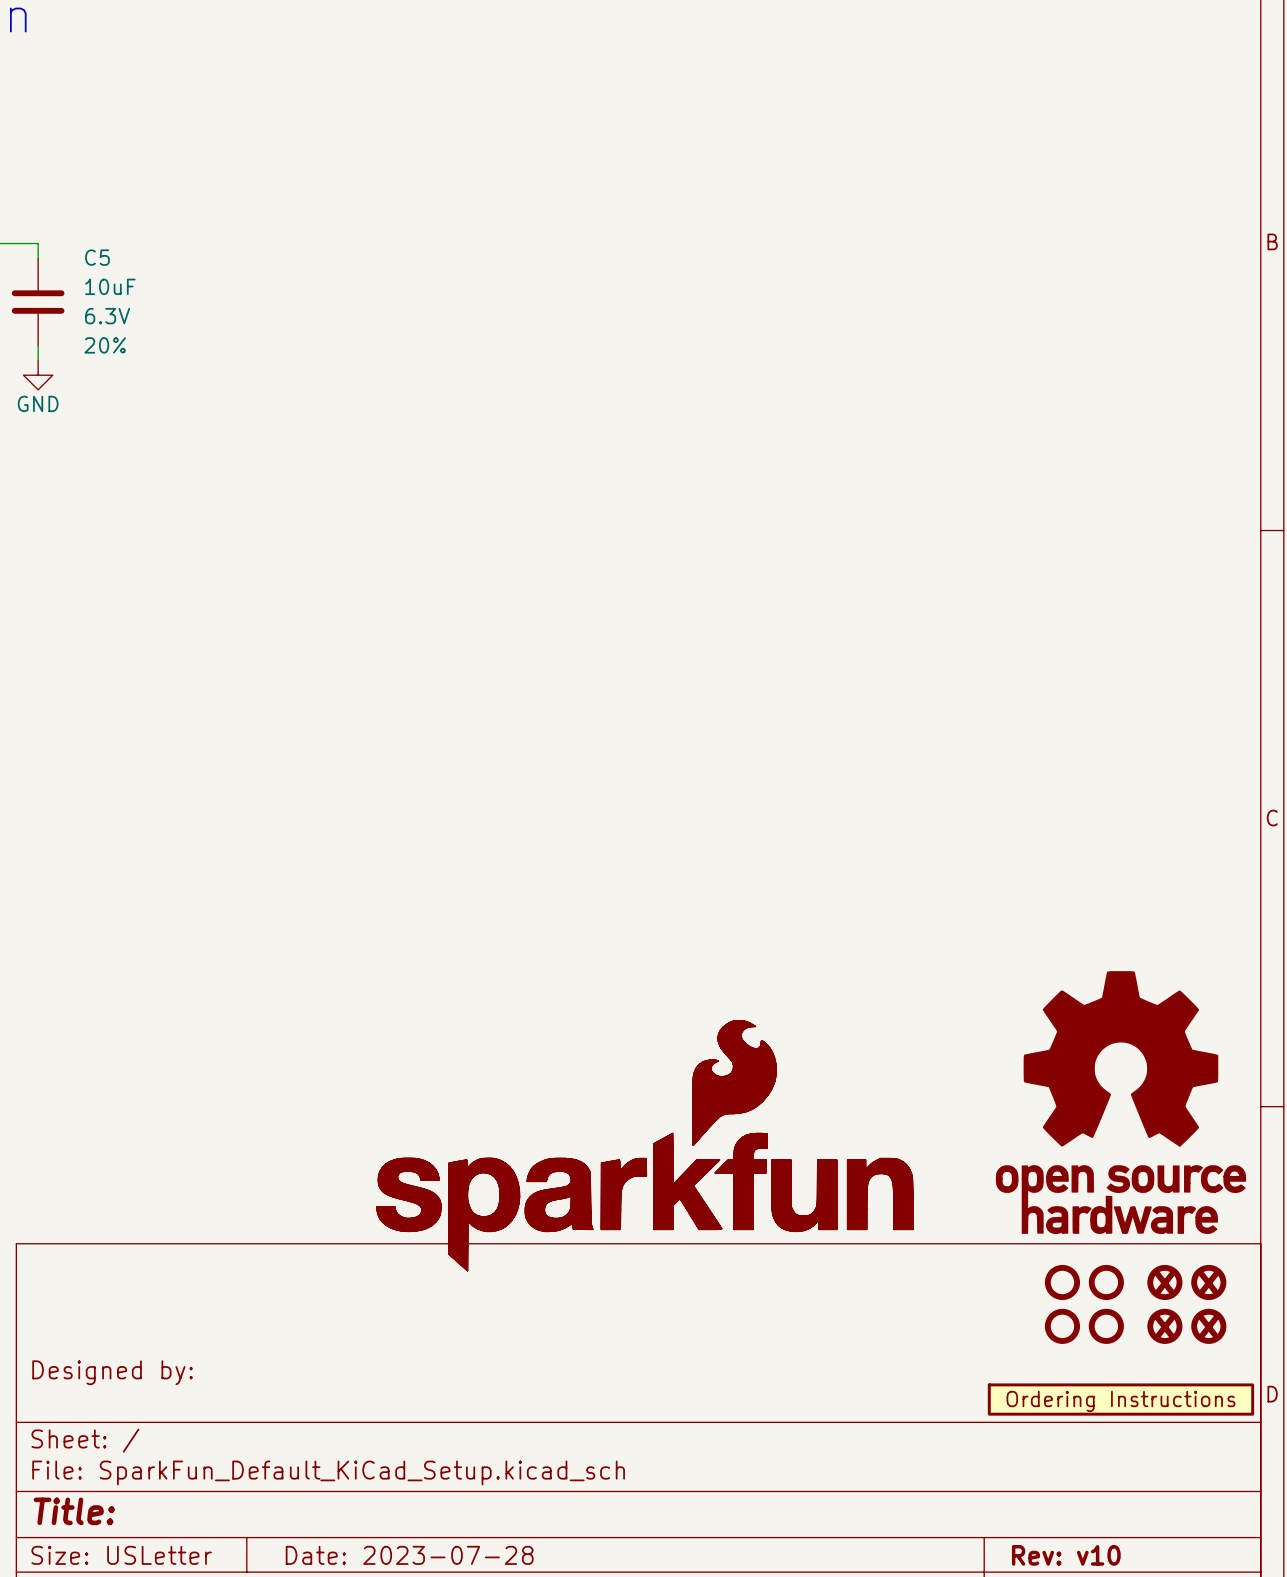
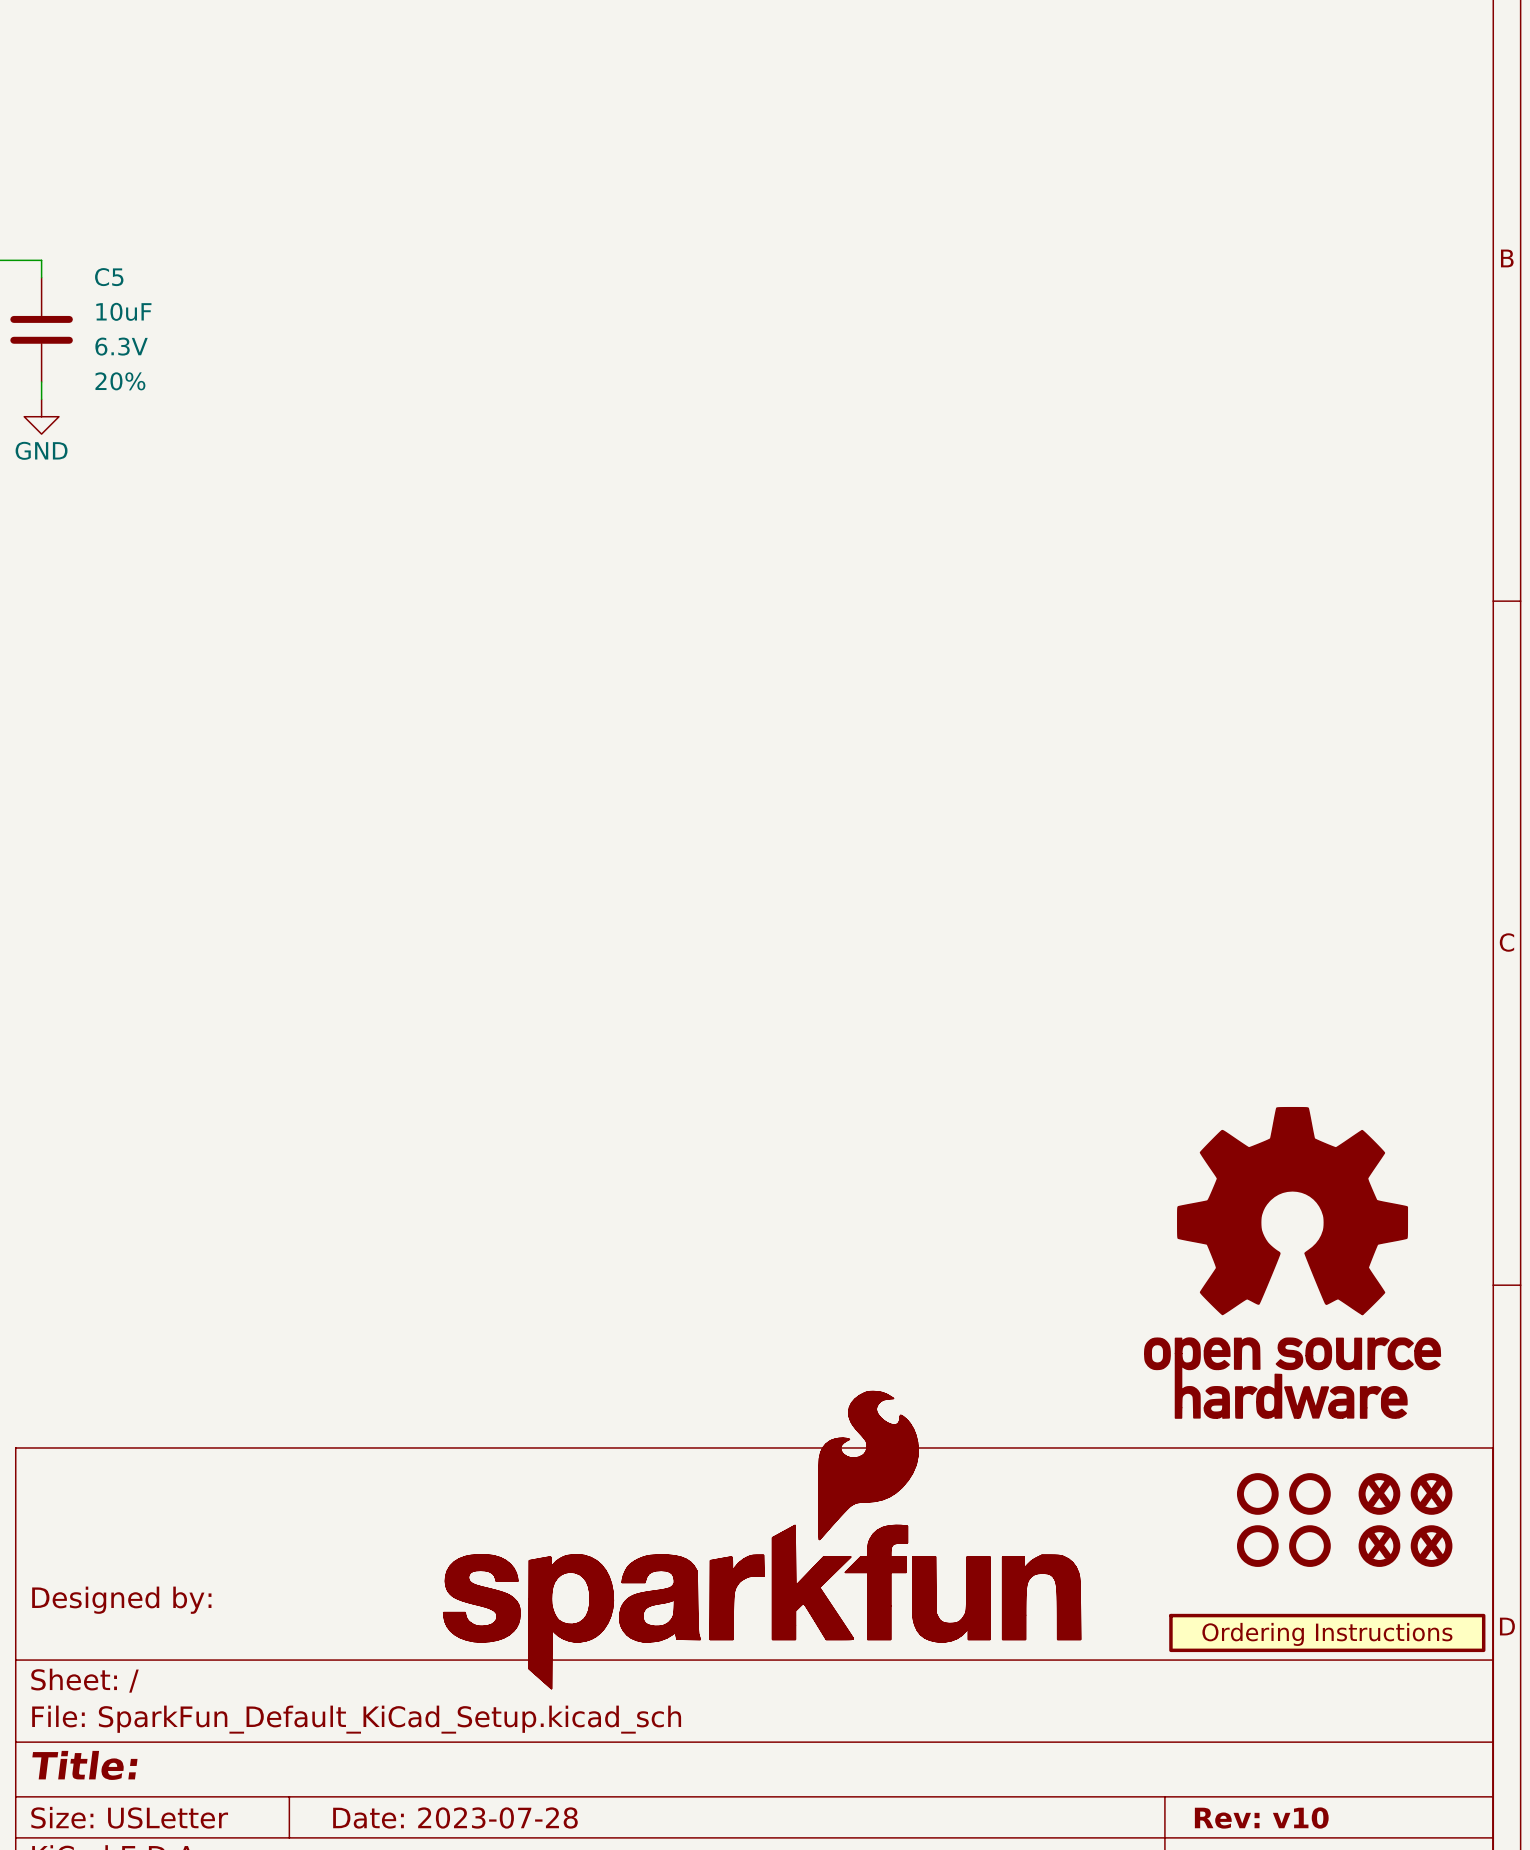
part position: (1121, 1102) -> (1292, 1262)
part position: (644, 1145) -> (762, 1540)

